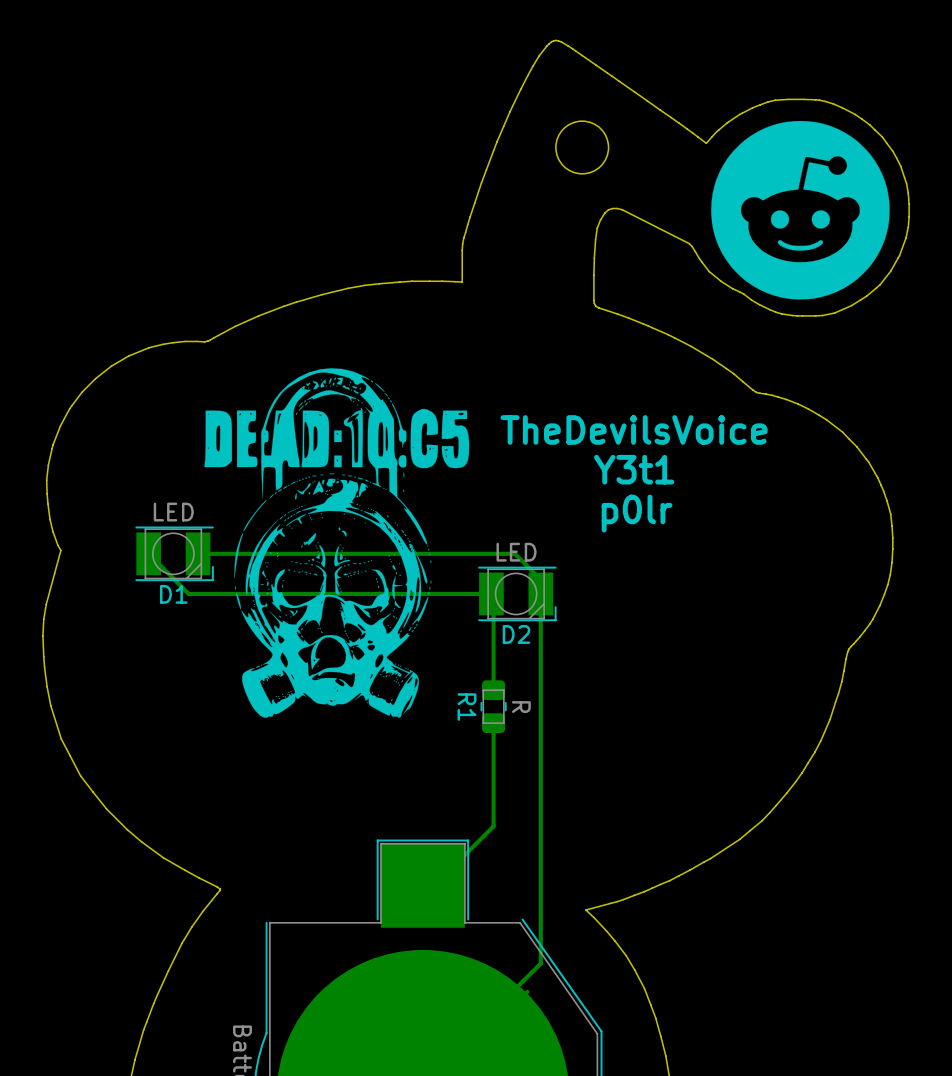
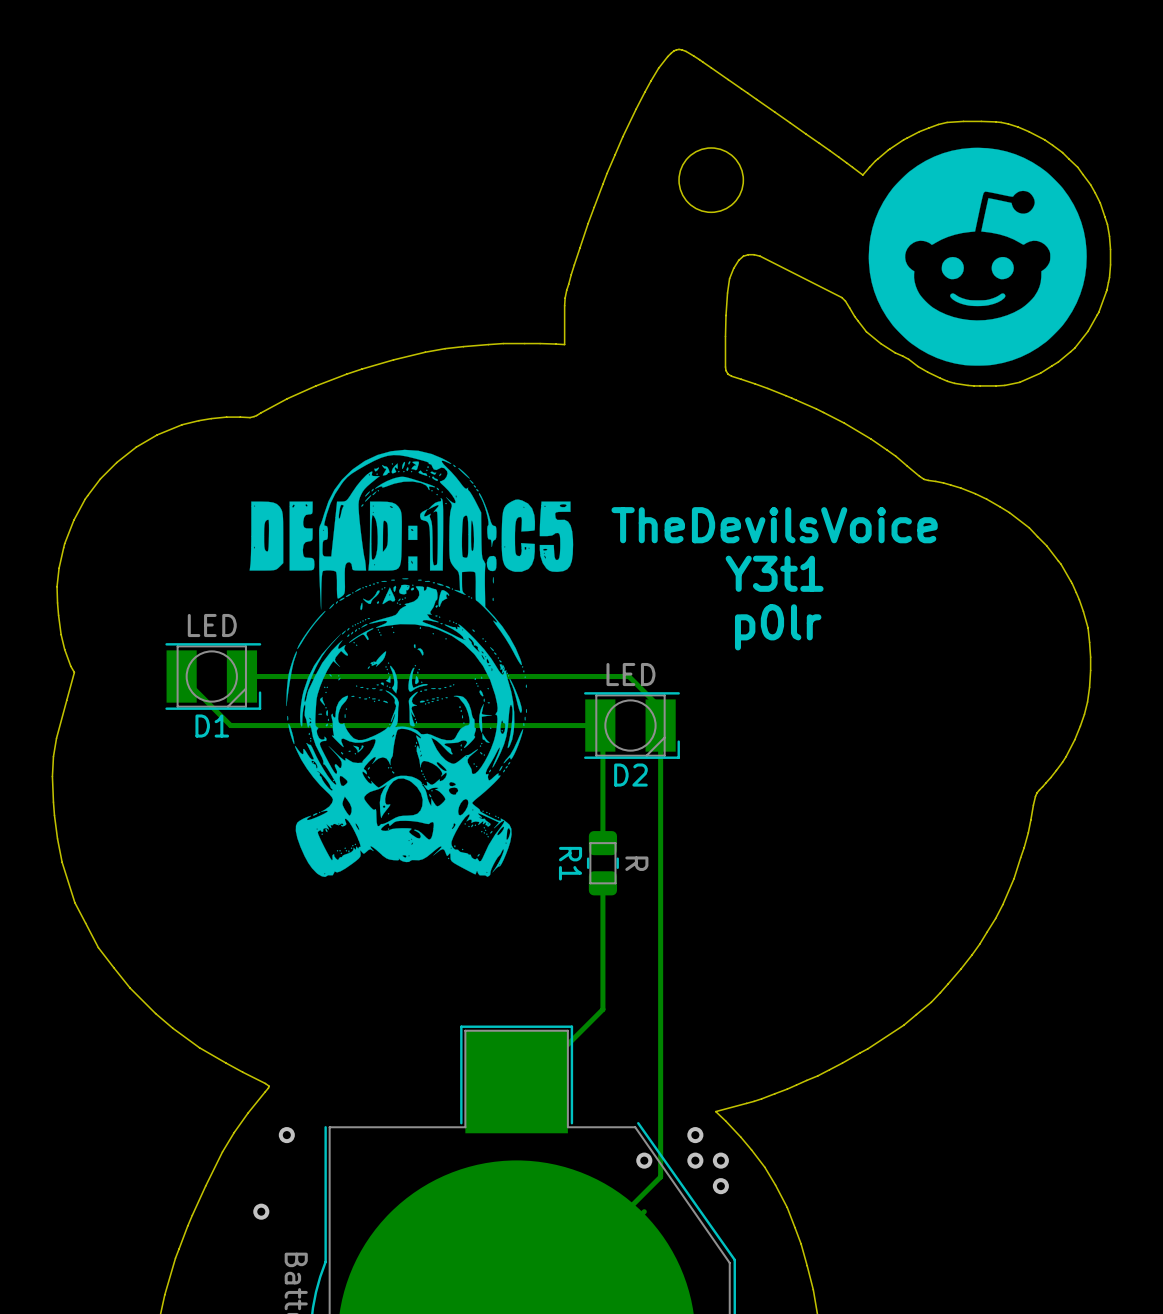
via: none -> (286, 1135)
via: none -> (695, 1135)
via: none -> (644, 1160)
via: none -> (695, 1160)
via: none -> (720, 1160)
via: none -> (720, 1186)
via: none -> (261, 1211)

